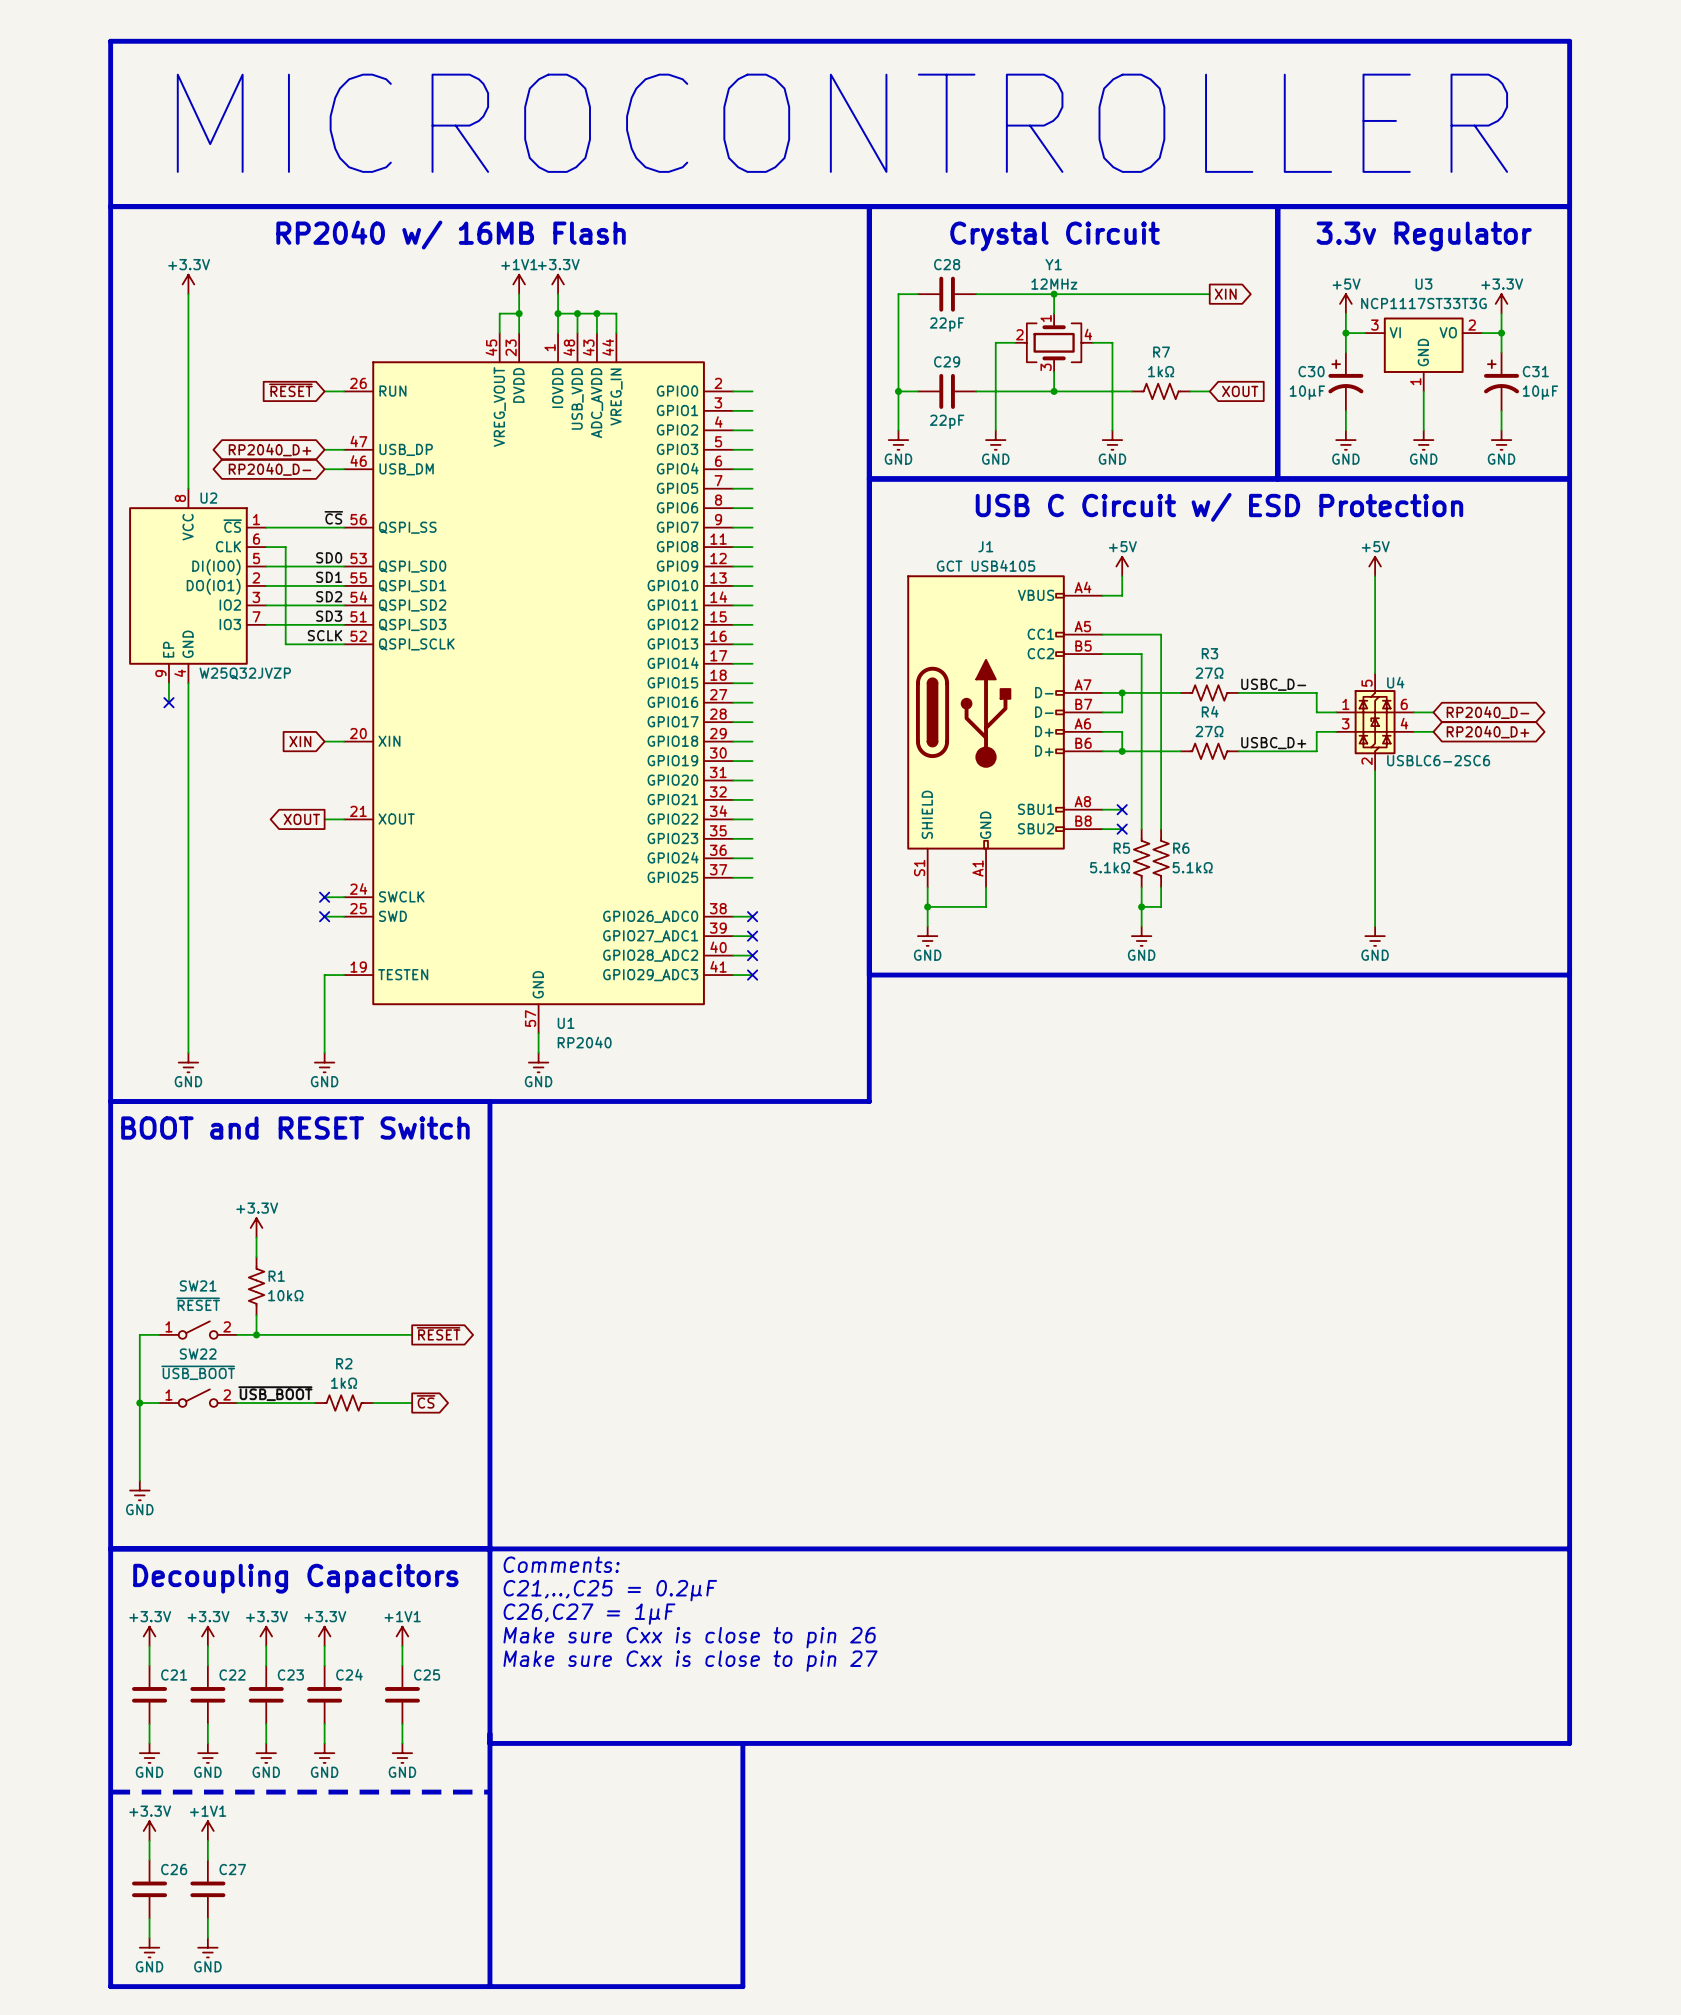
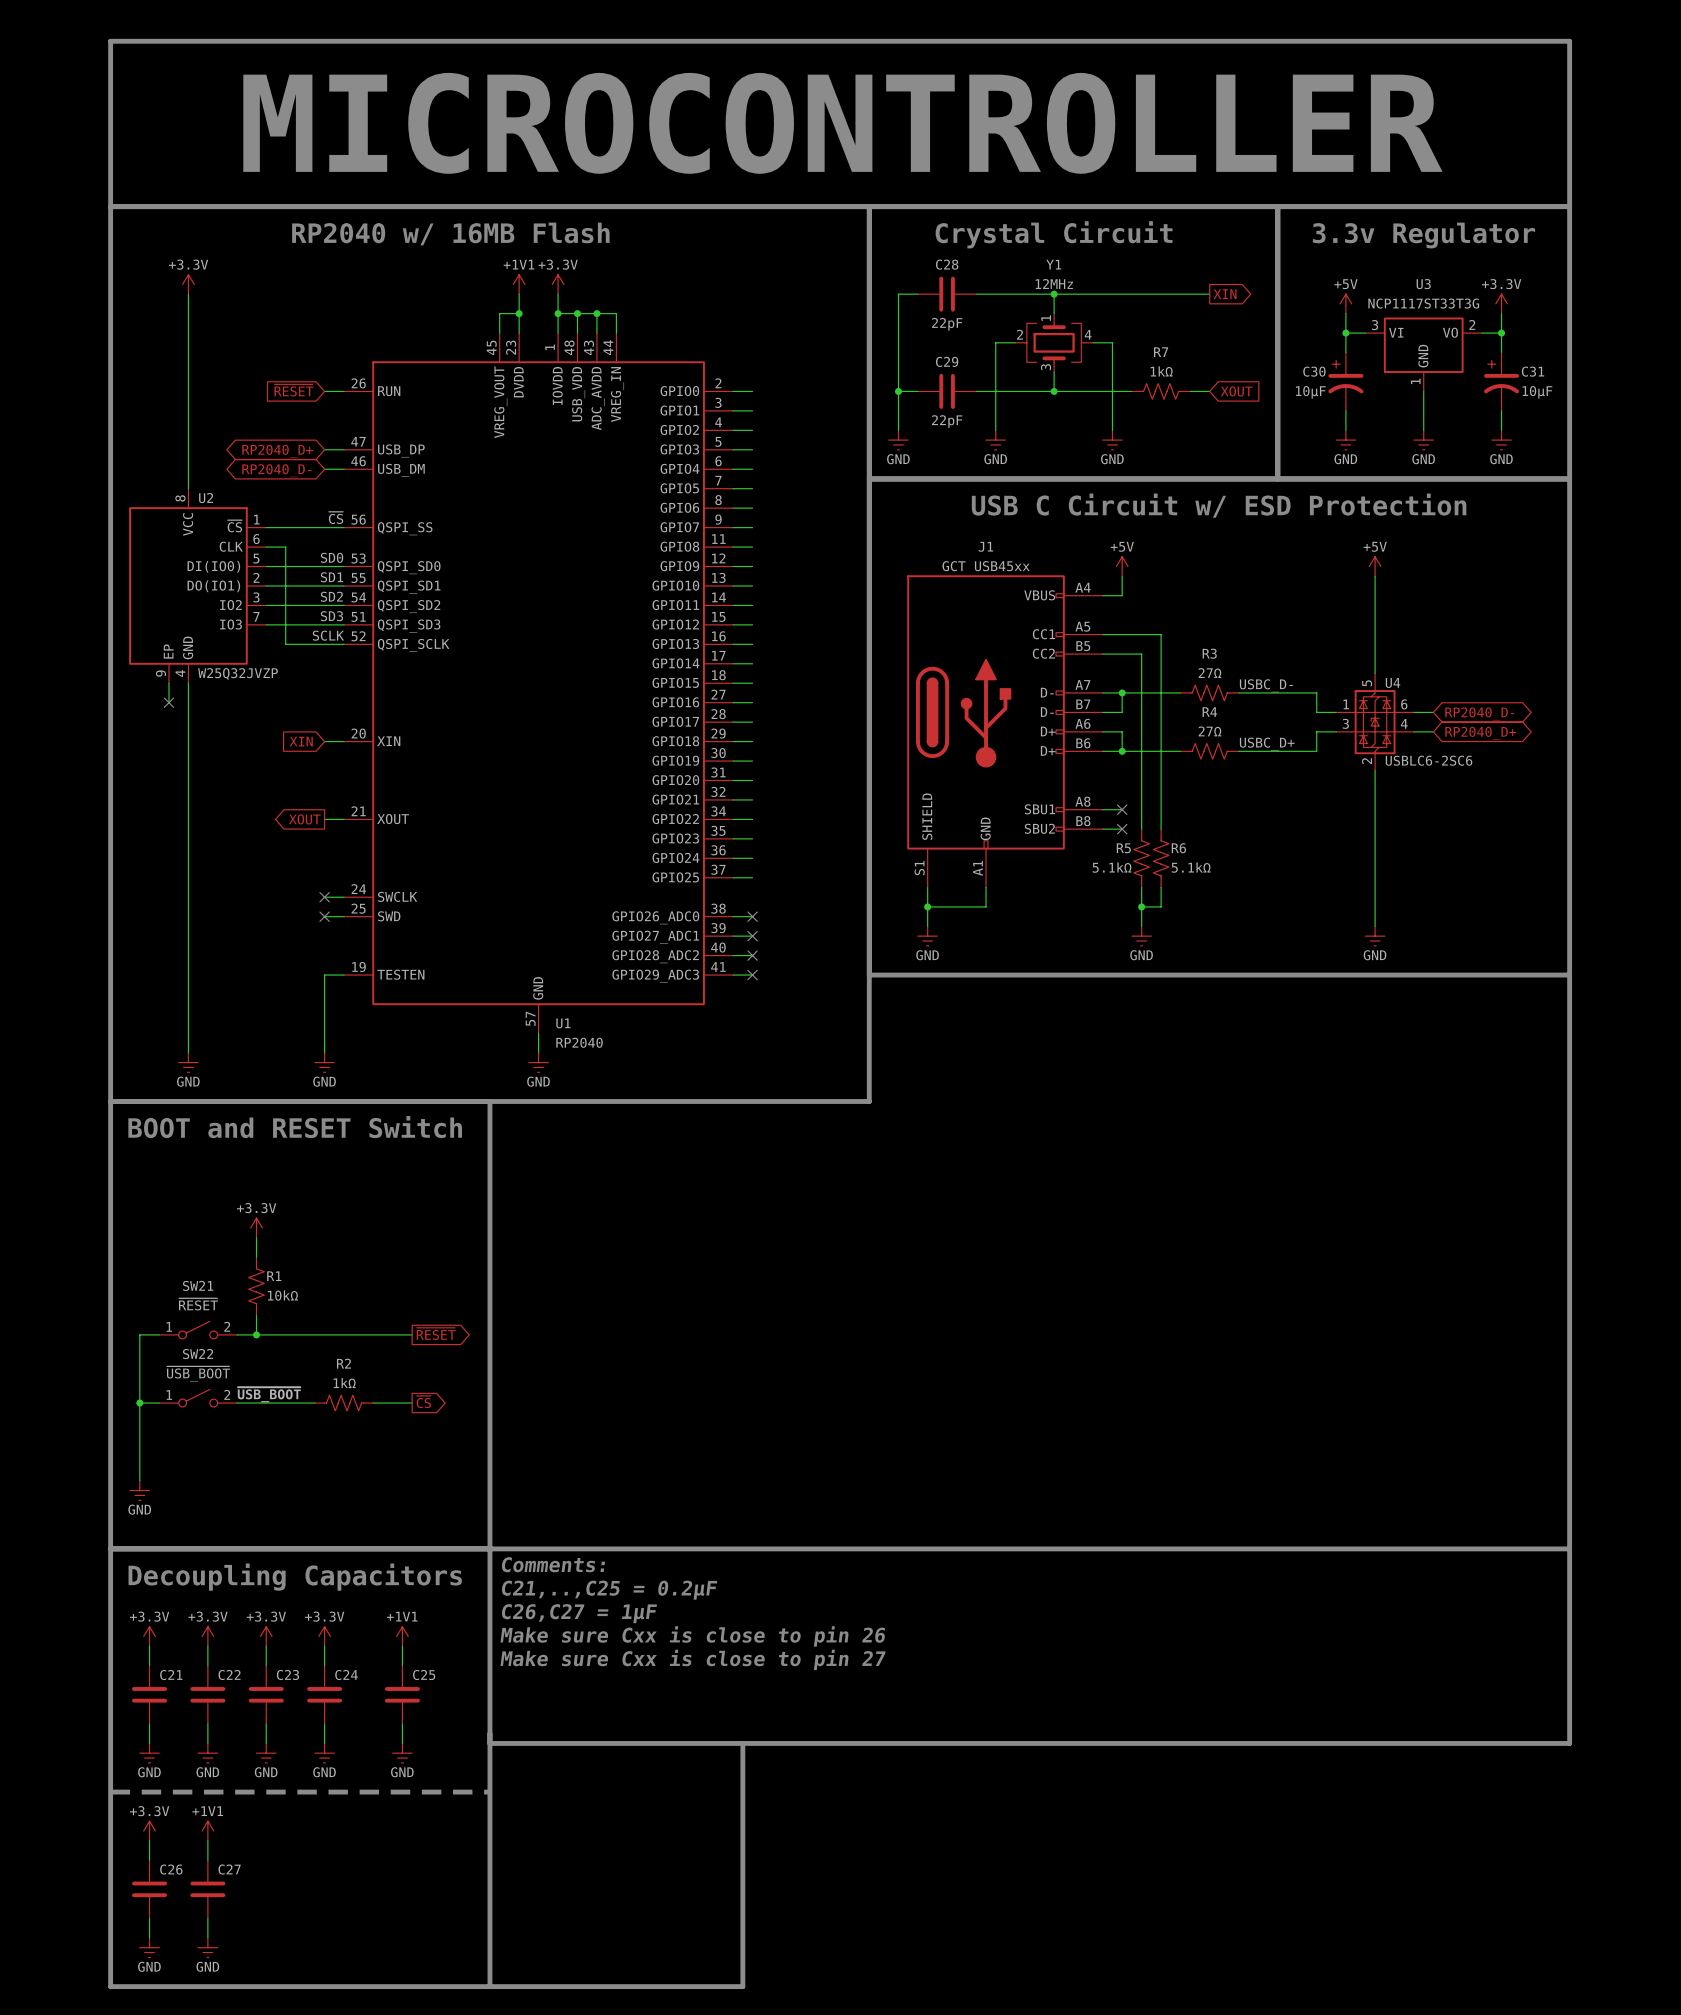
J1 value: GCT USB4105 (986, 565) -> GCT USB45xx (986, 566)

